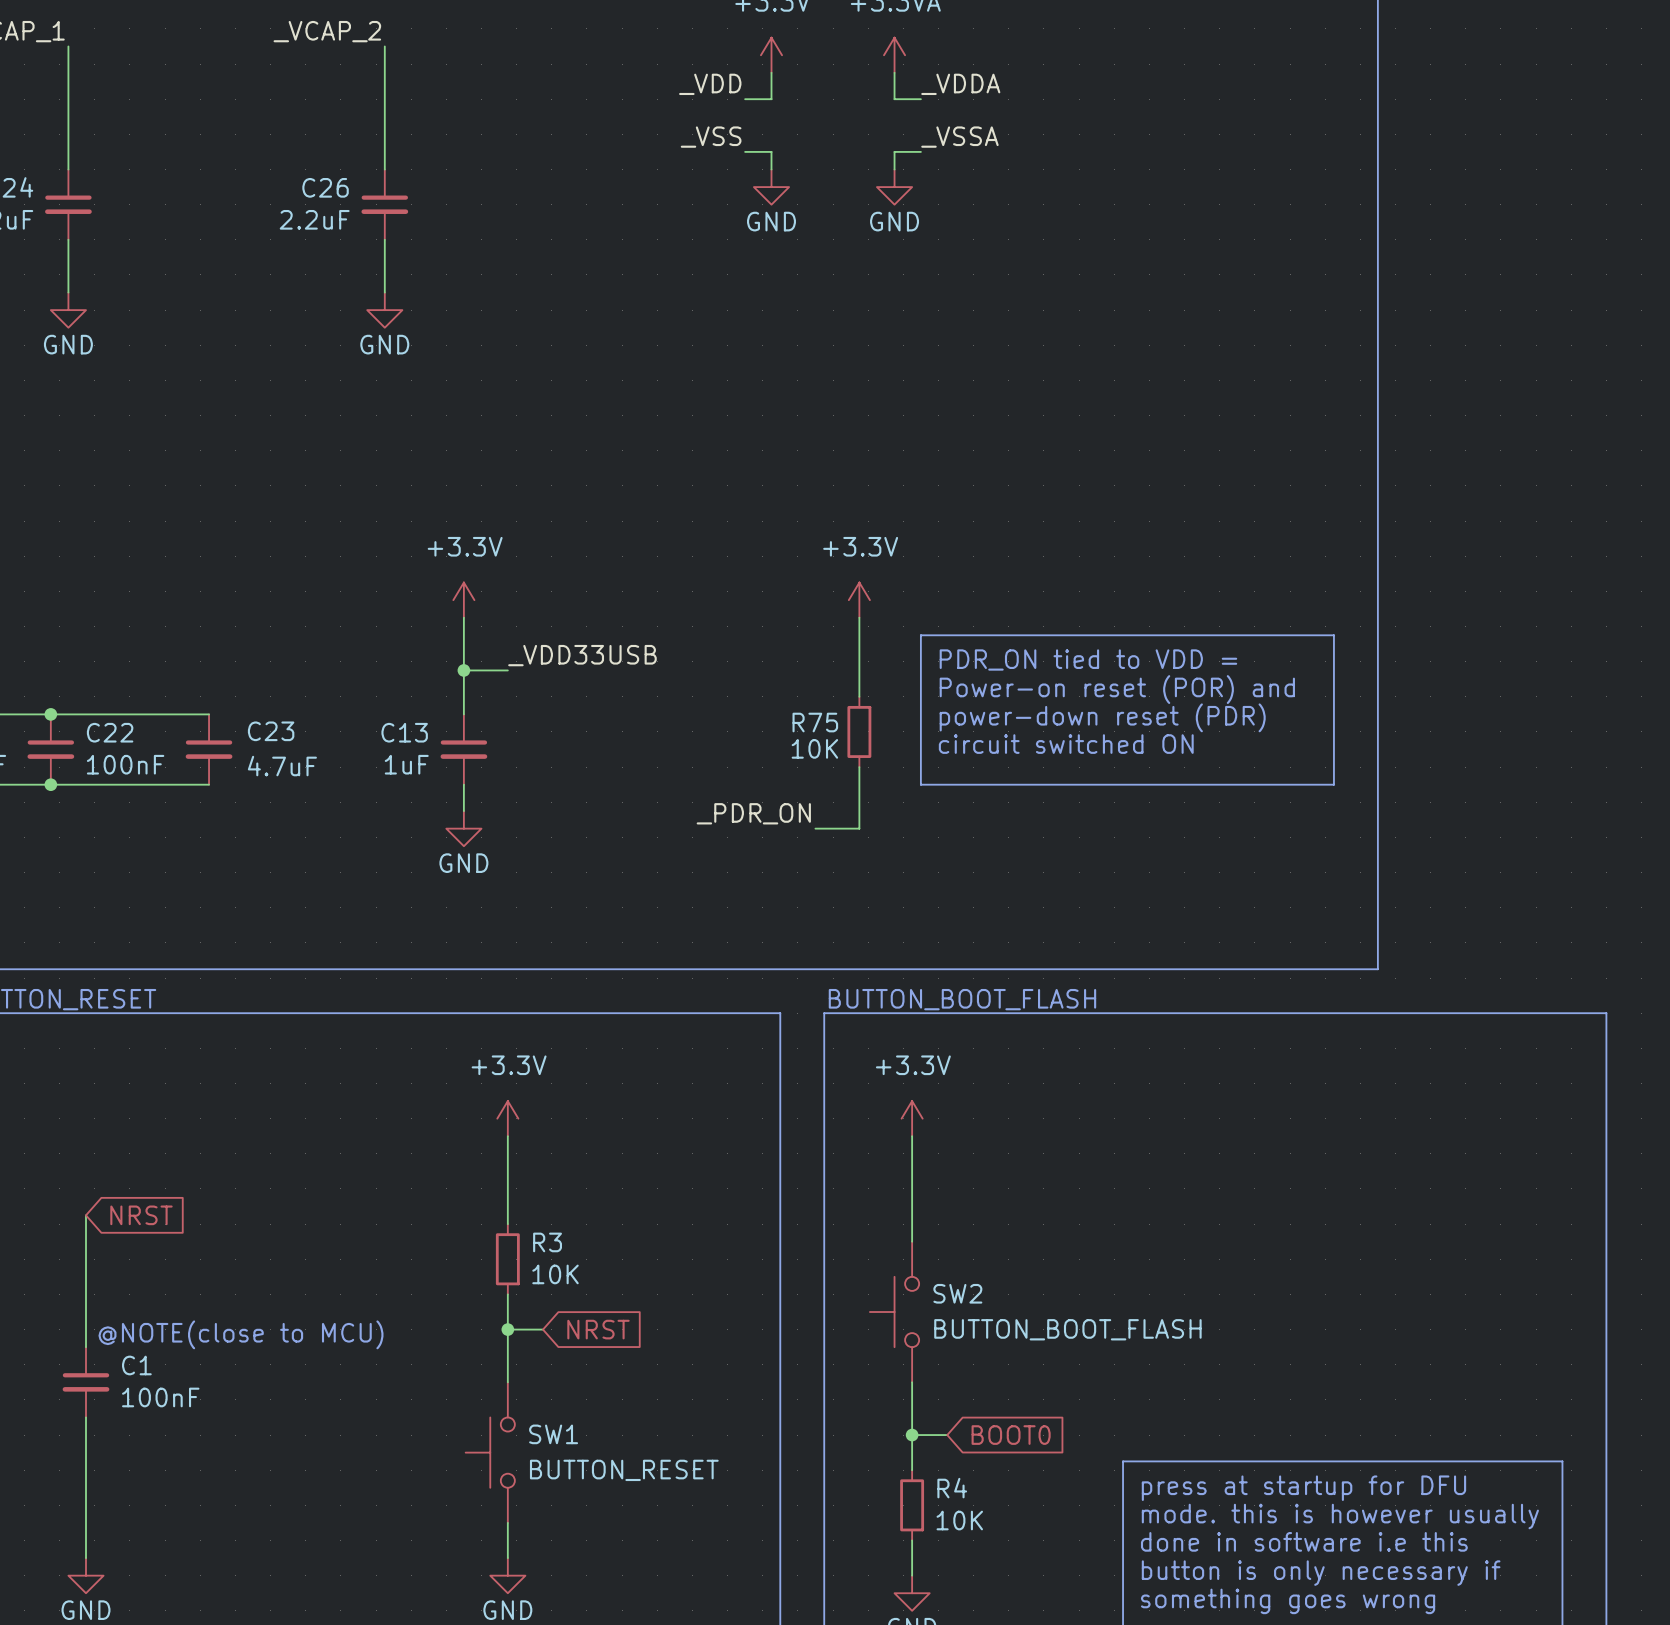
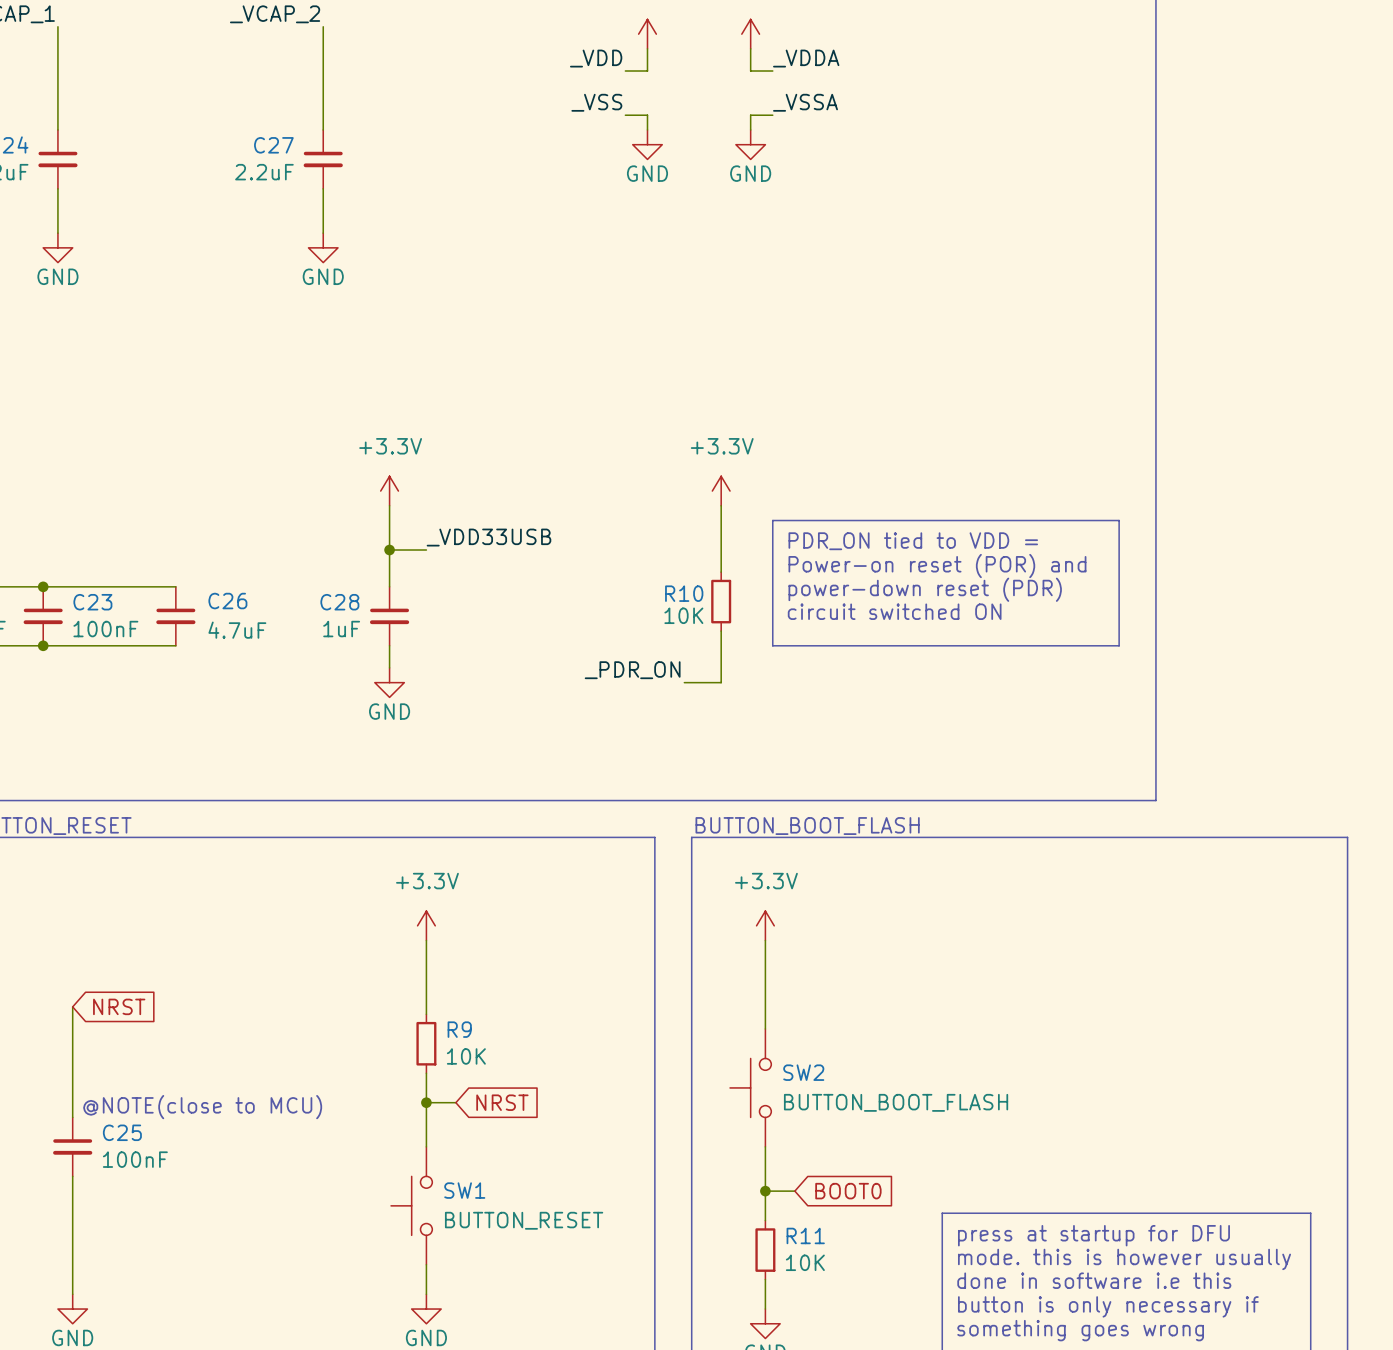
C26 name: C26 (325, 187) -> C27 (273, 145)
R75 name: R75 (815, 722) -> R10 (684, 593)
C23 name: C23 (271, 731) -> C26 (227, 601)
C22 name: C22 (110, 732) -> C23 (92, 602)
C13 name: C13 (404, 732) -> C28 (339, 602)
R3 name: R3 (547, 1242) -> R9 (459, 1029)
C1 name: C1 (136, 1365) -> C25 (122, 1132)
R4 name: R4 (952, 1488) -> R11 (805, 1235)

